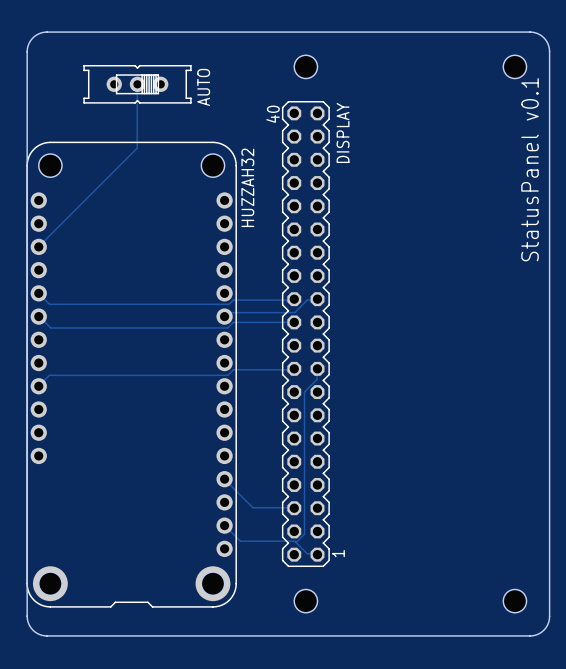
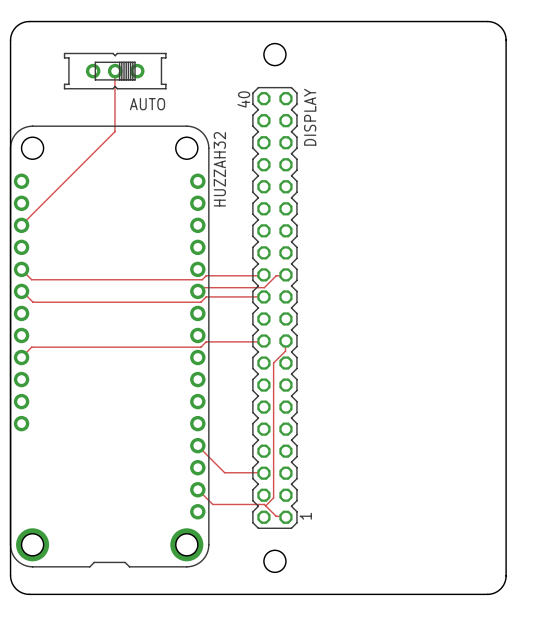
hole: (514, 66) -> none
AUTO name rotation: 0° (203, 87) -> 90° clockwise (147, 104)
text: StatusPanel v0.1 (530, 169) -> none
hole: (514, 601) -> none

